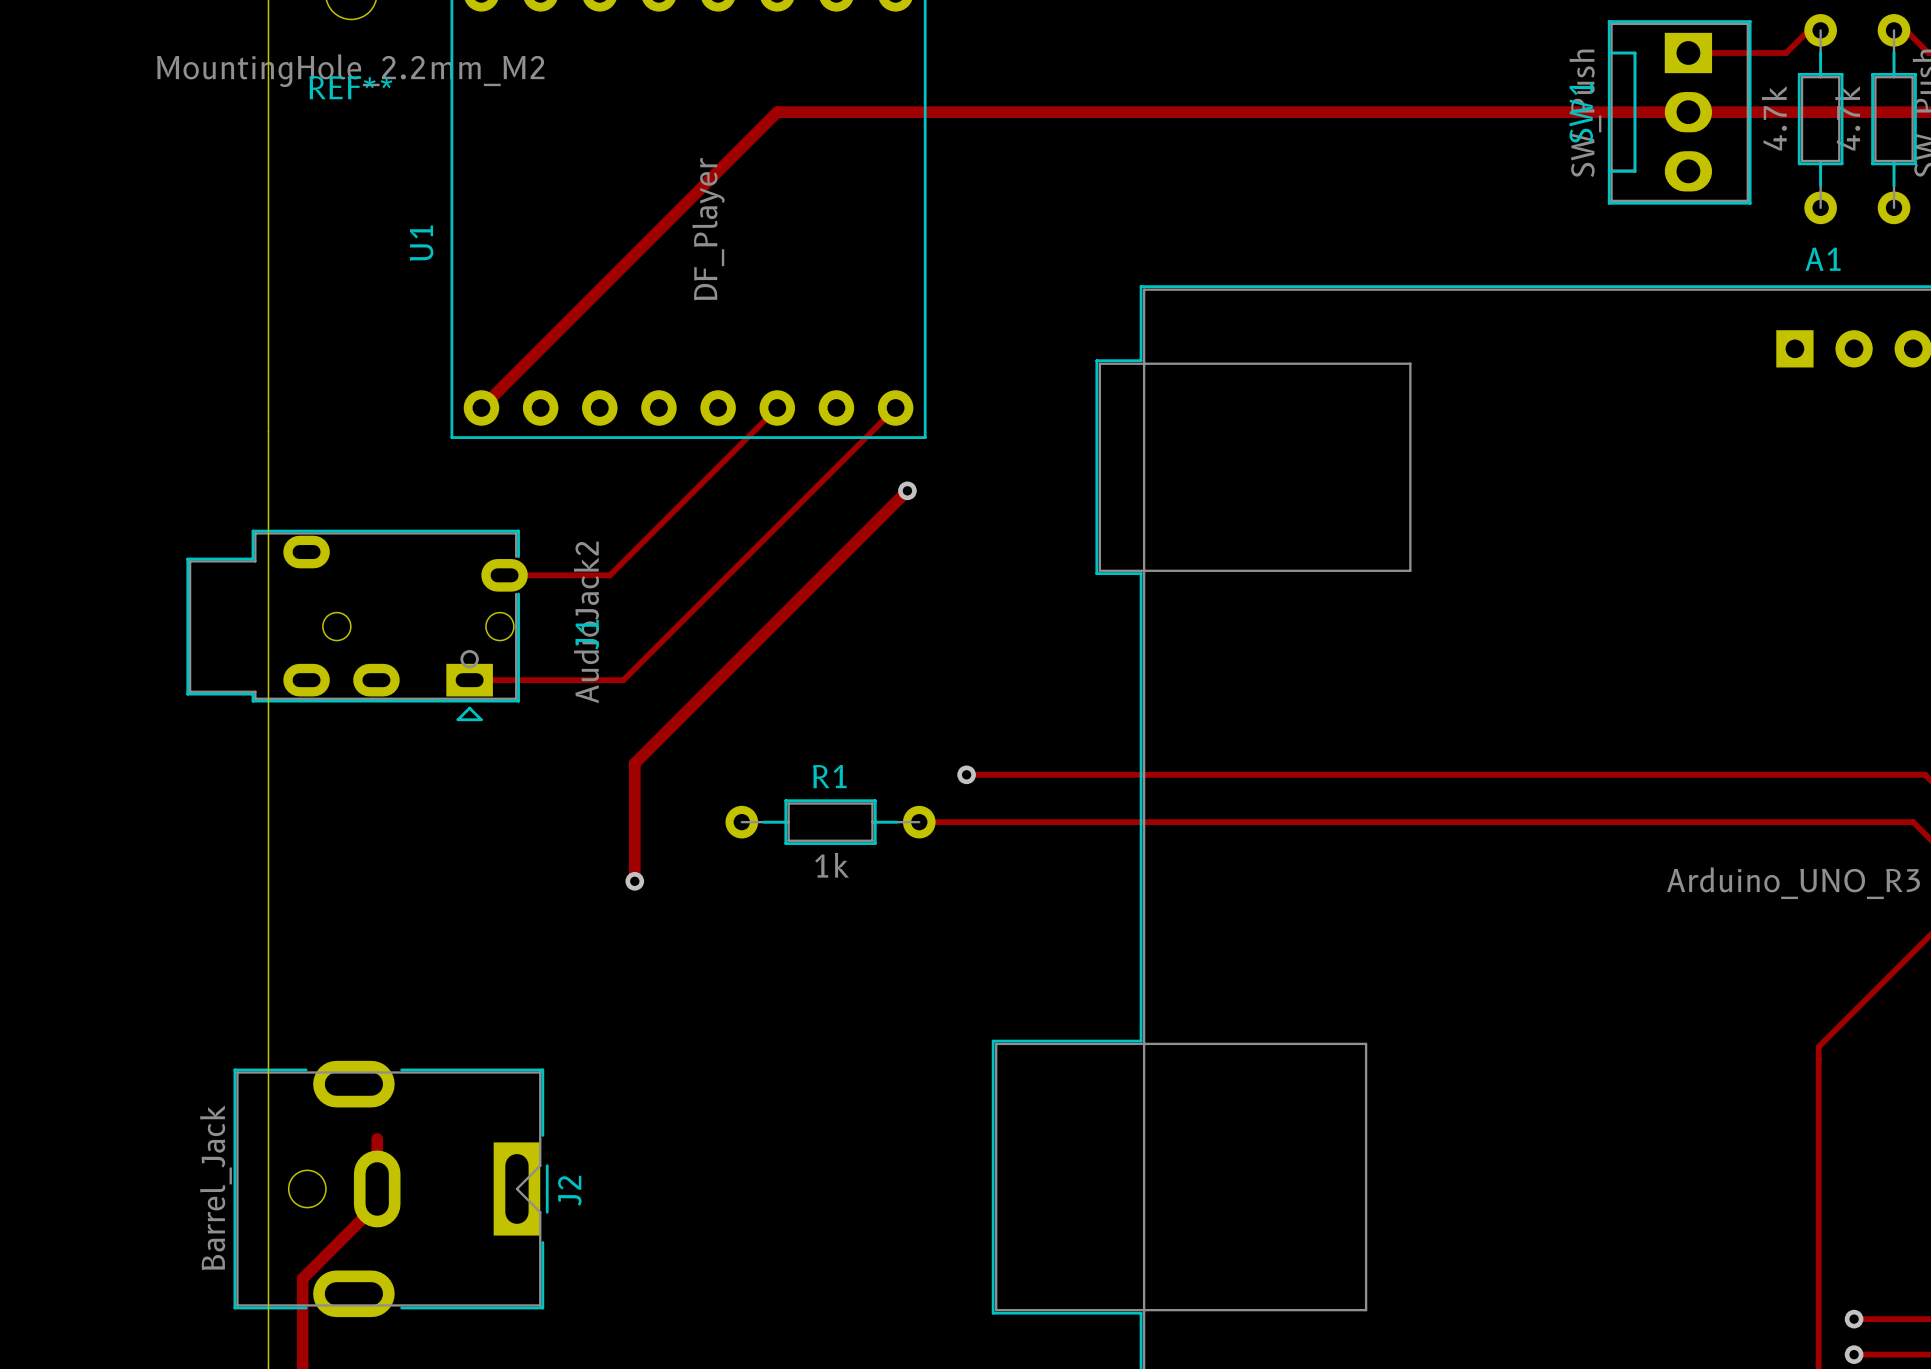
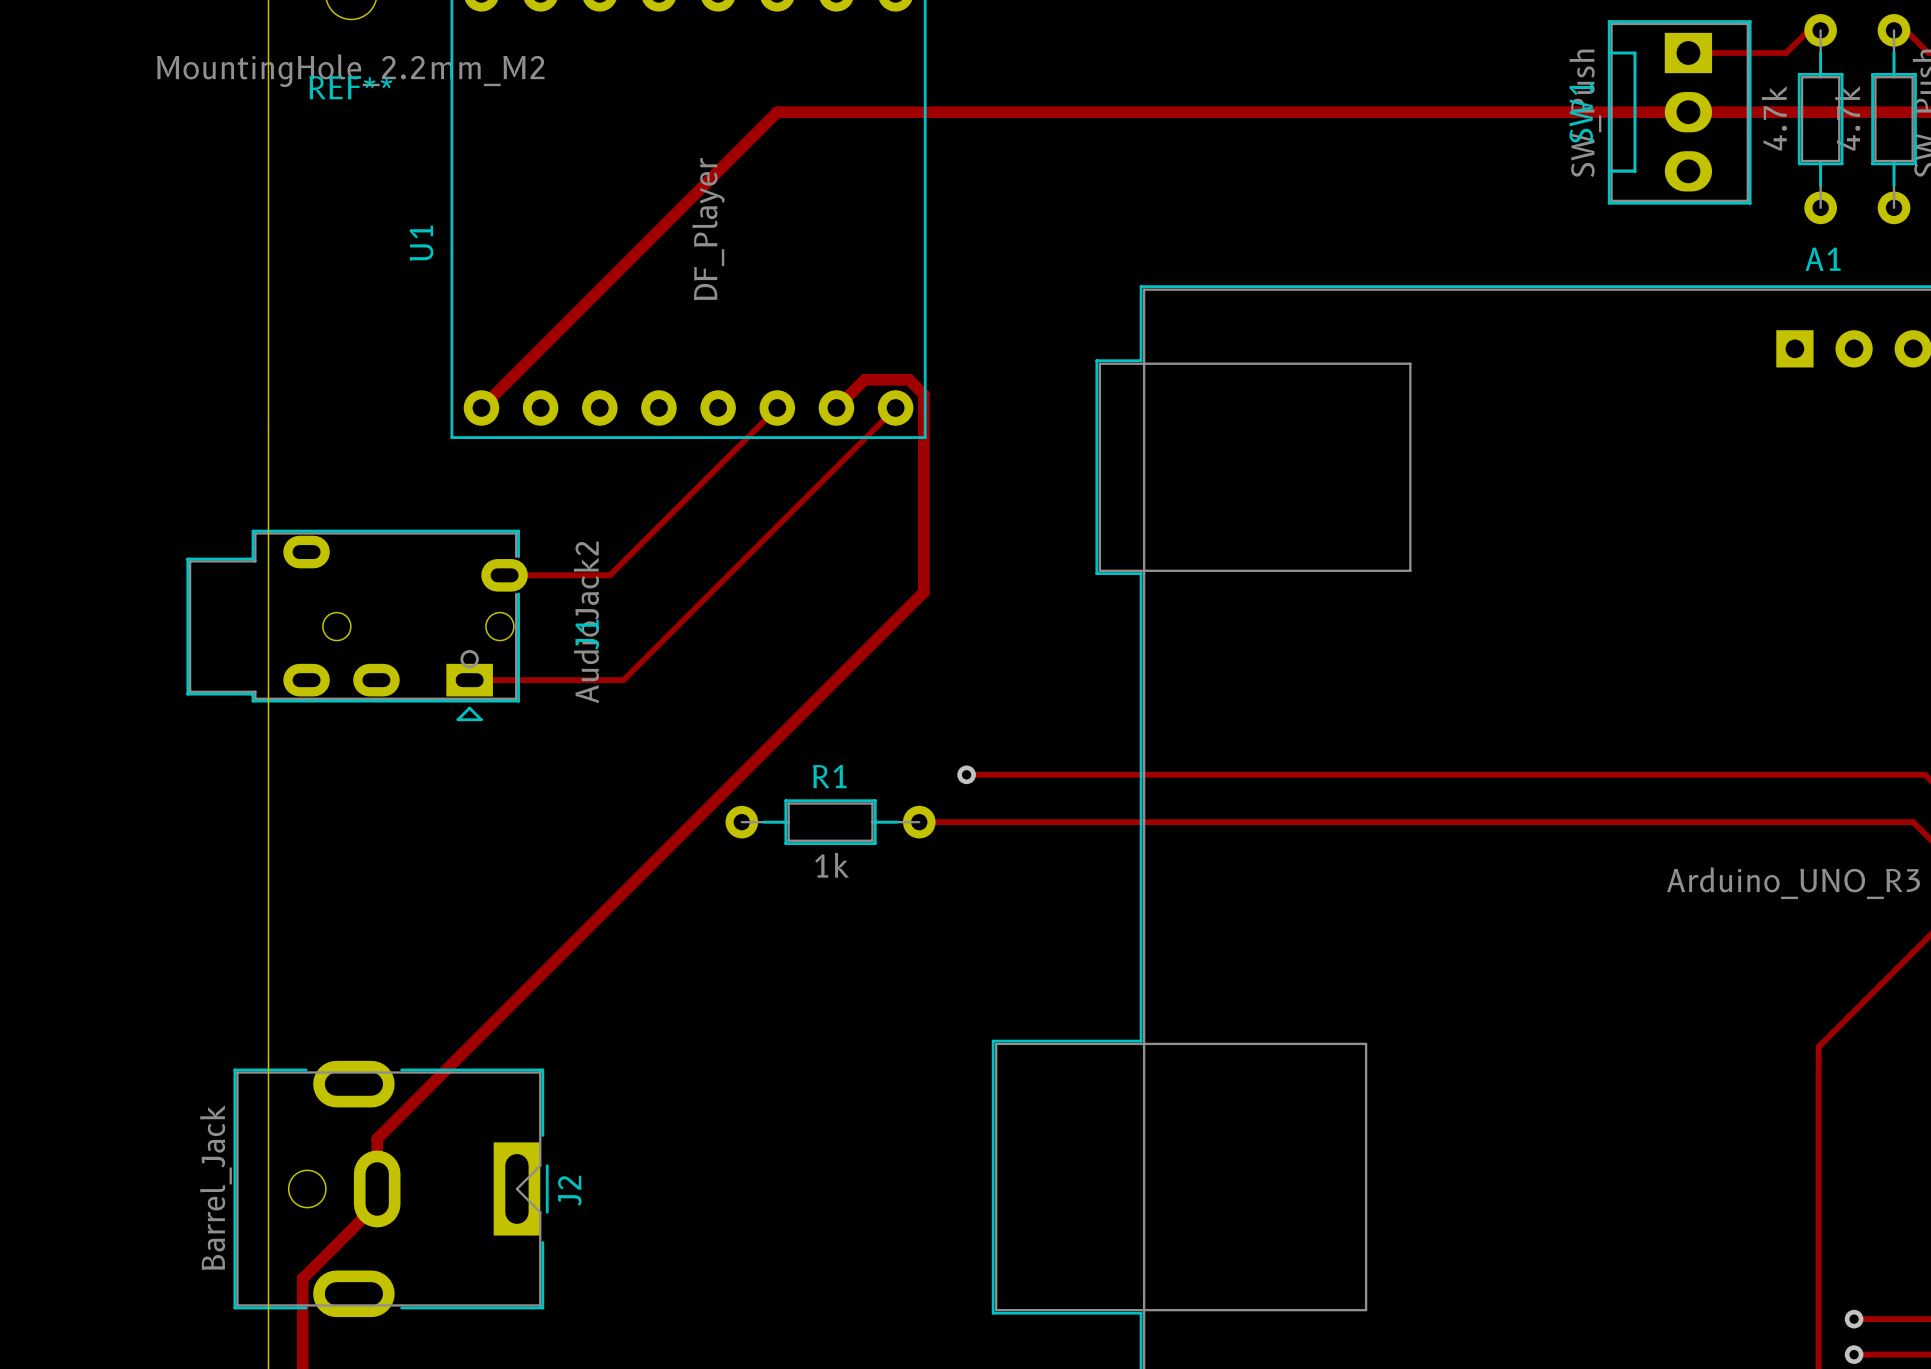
track: none -> (836, 407) (864, 379) (909, 379) (923, 394) (923, 592) (377, 1138)
track: (907, 490) (634, 763) (634, 881) -> none
via: (907, 490) -> none
via: (634, 881) -> none

